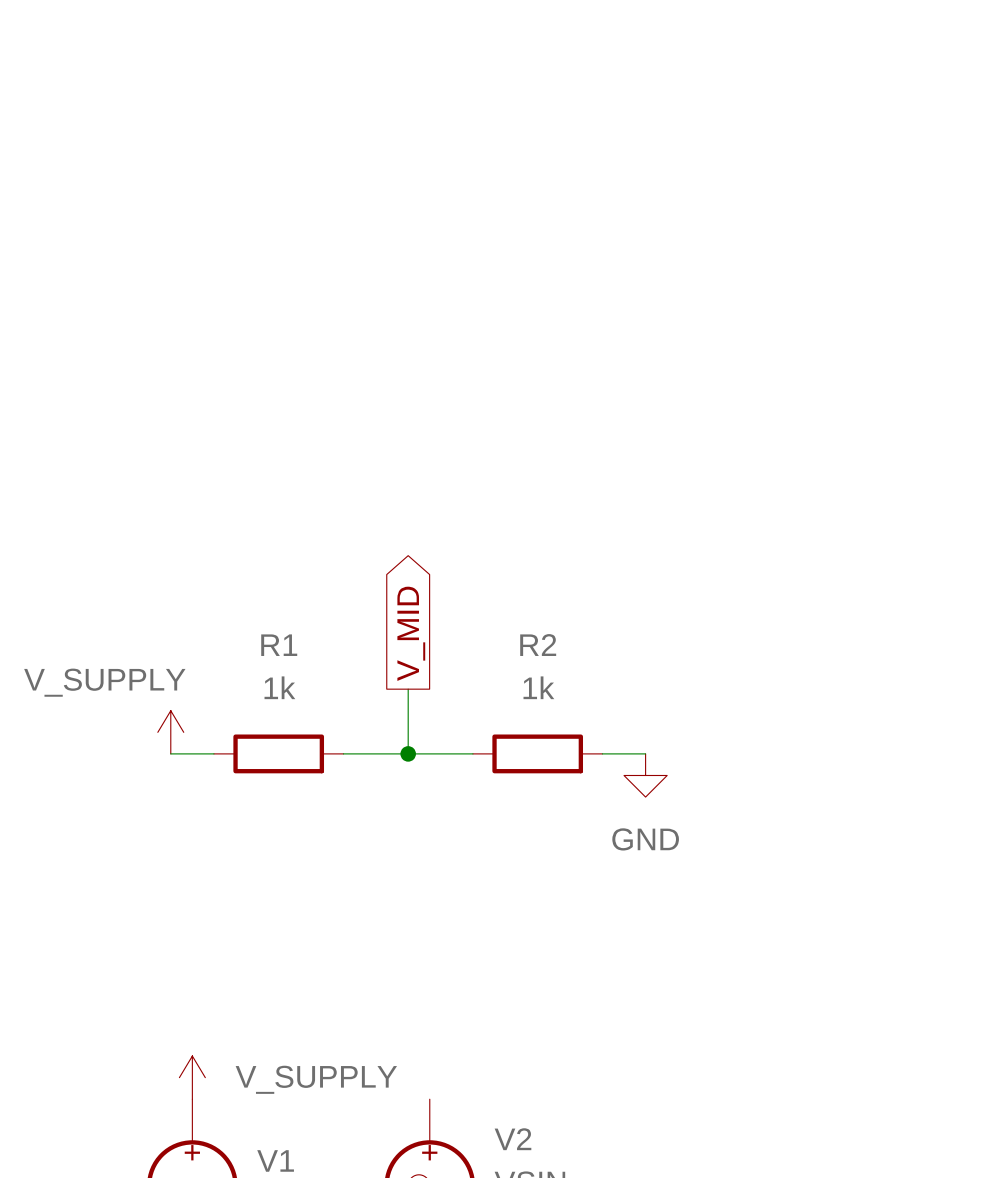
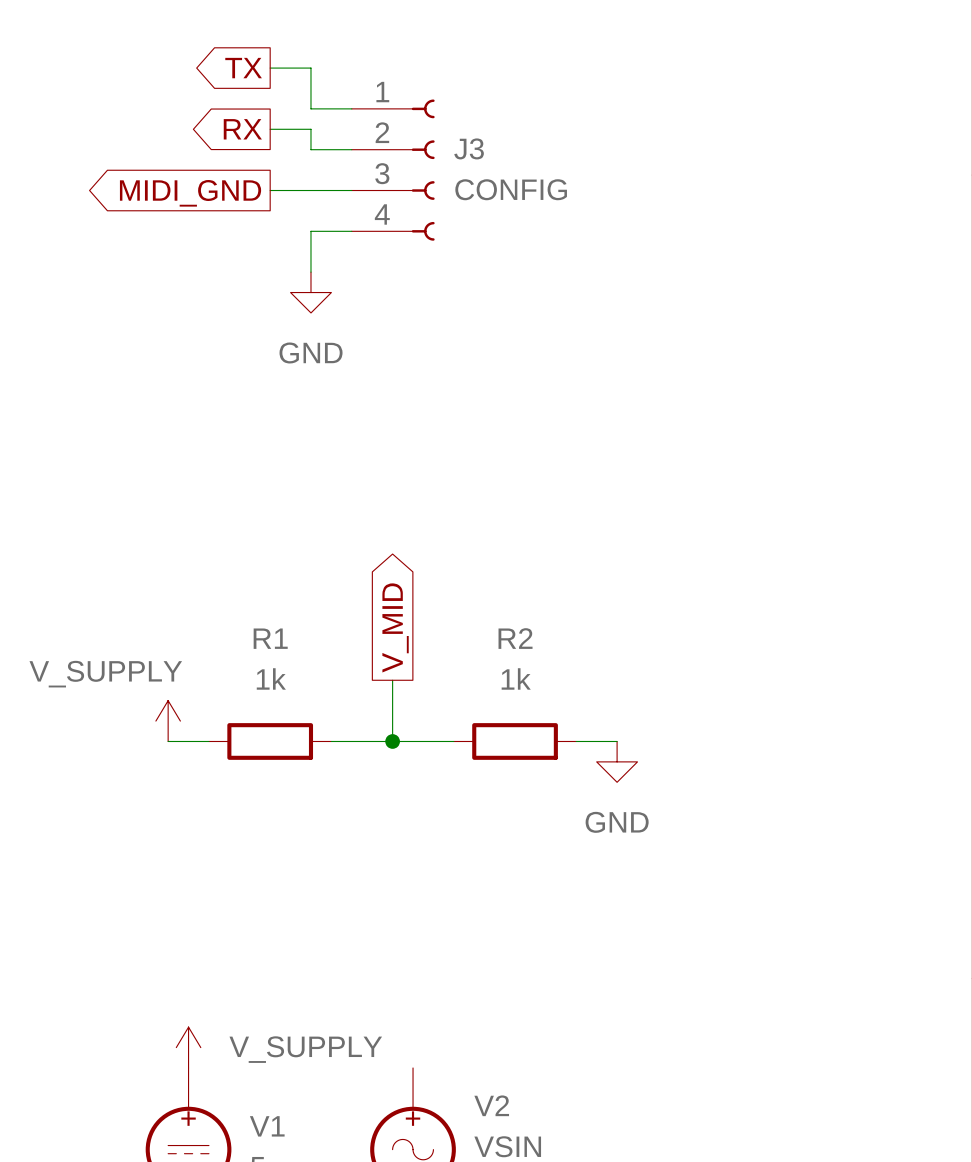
global label: none -> TX (243, 68)
wire: none -> (270, 68) (310, 68) (310, 108) (351, 108)
global label: none -> RX (242, 129)
wire: none -> (270, 129) (310, 129) (310, 149) (351, 149)
J3: none -> CONFIG (393, 170)
wire: none -> (270, 190) (351, 190)
global label: none -> MIDI_GND (190, 193)
wire: none -> (351, 231) (310, 231) (310, 272)
power symbol: none -> GND (310, 292)

